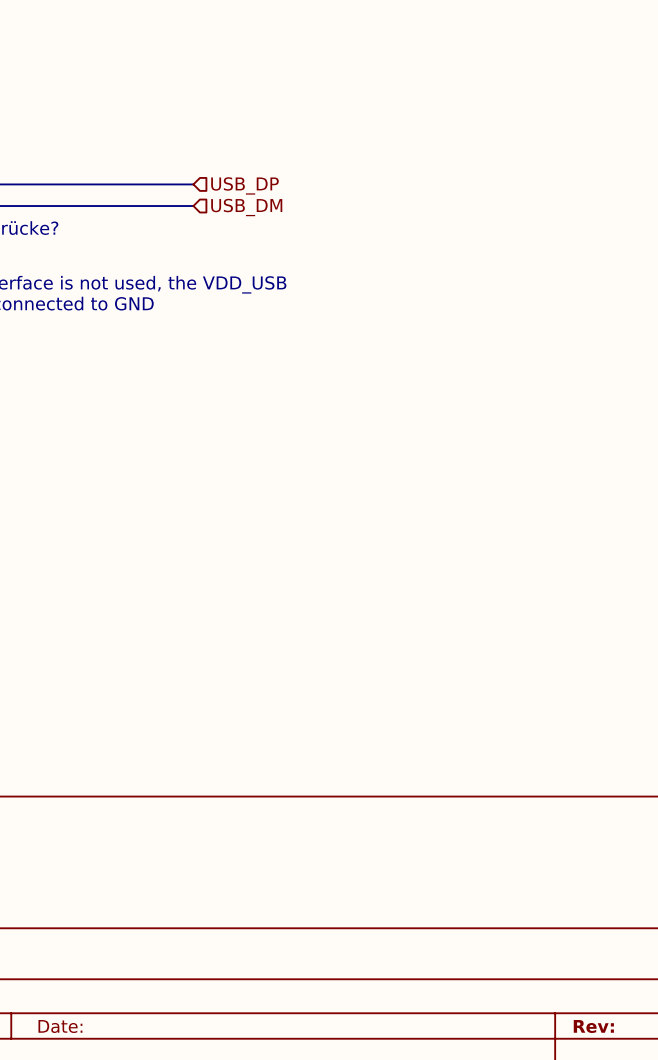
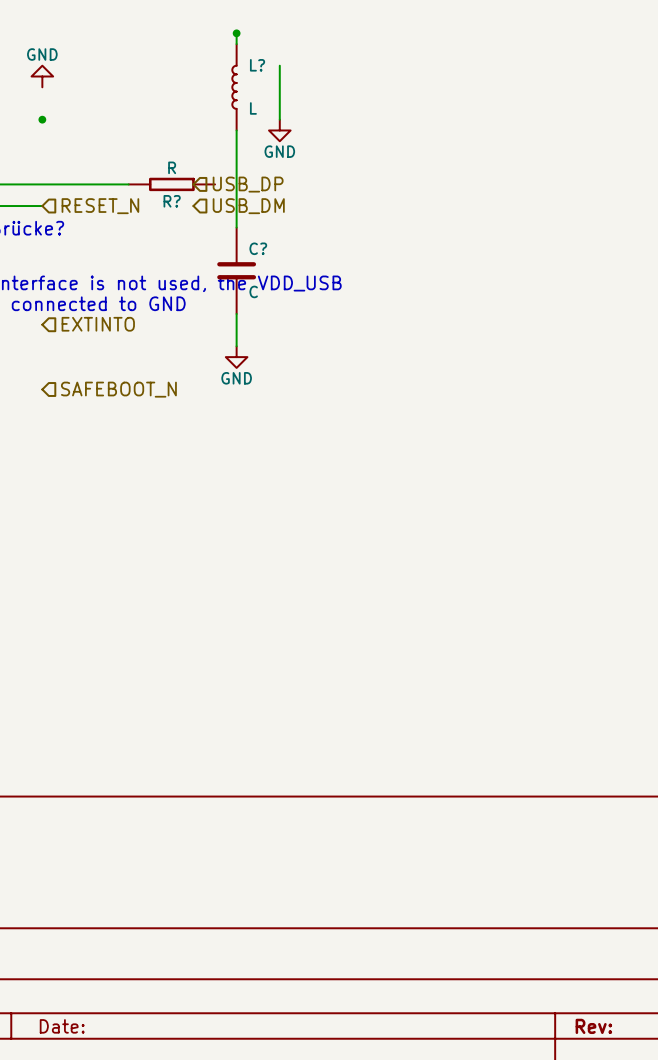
wire: none -> (236, 33) (236, 44)
junction: none -> (236, 33)
wire: none -> (279, 65) (279, 119)
power symbol: none -> GND (42, 76)
L?: none -> L (234, 87)
junction: none -> (42, 119)
wire: none -> (236, 130) (236, 227)
power symbol: none -> GND (279, 130)
wire: (128, 184) (193, 184) -> none
R?: none -> R (171, 184)
wire: (42, 206) (193, 206) -> none
hierarchical label: none -> RESET_N (100, 206)
C?: none -> C (236, 270)
wire: none -> (236, 313) (236, 346)
hierarchical label: none -> EXTINTO (98, 324)
power symbol: none -> GND (236, 357)
hierarchical label: none -> SAFEBOOT_N (118, 389)

